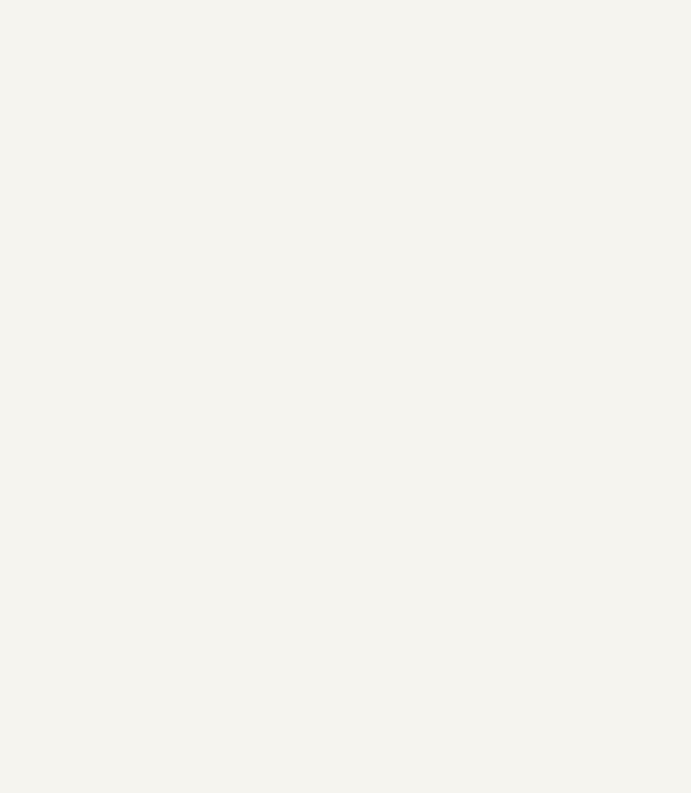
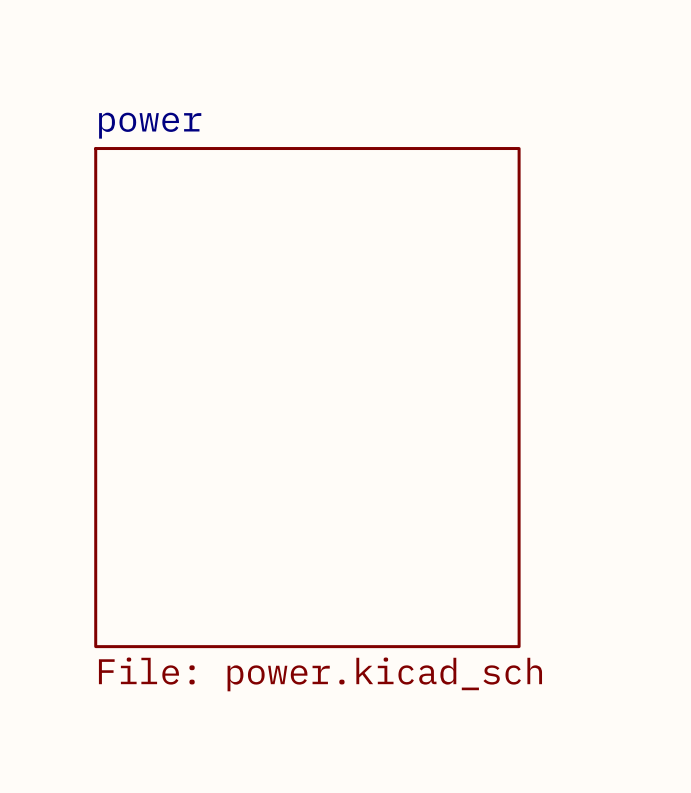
sheet power: none -> File: power.kicad_sch (307, 397)

